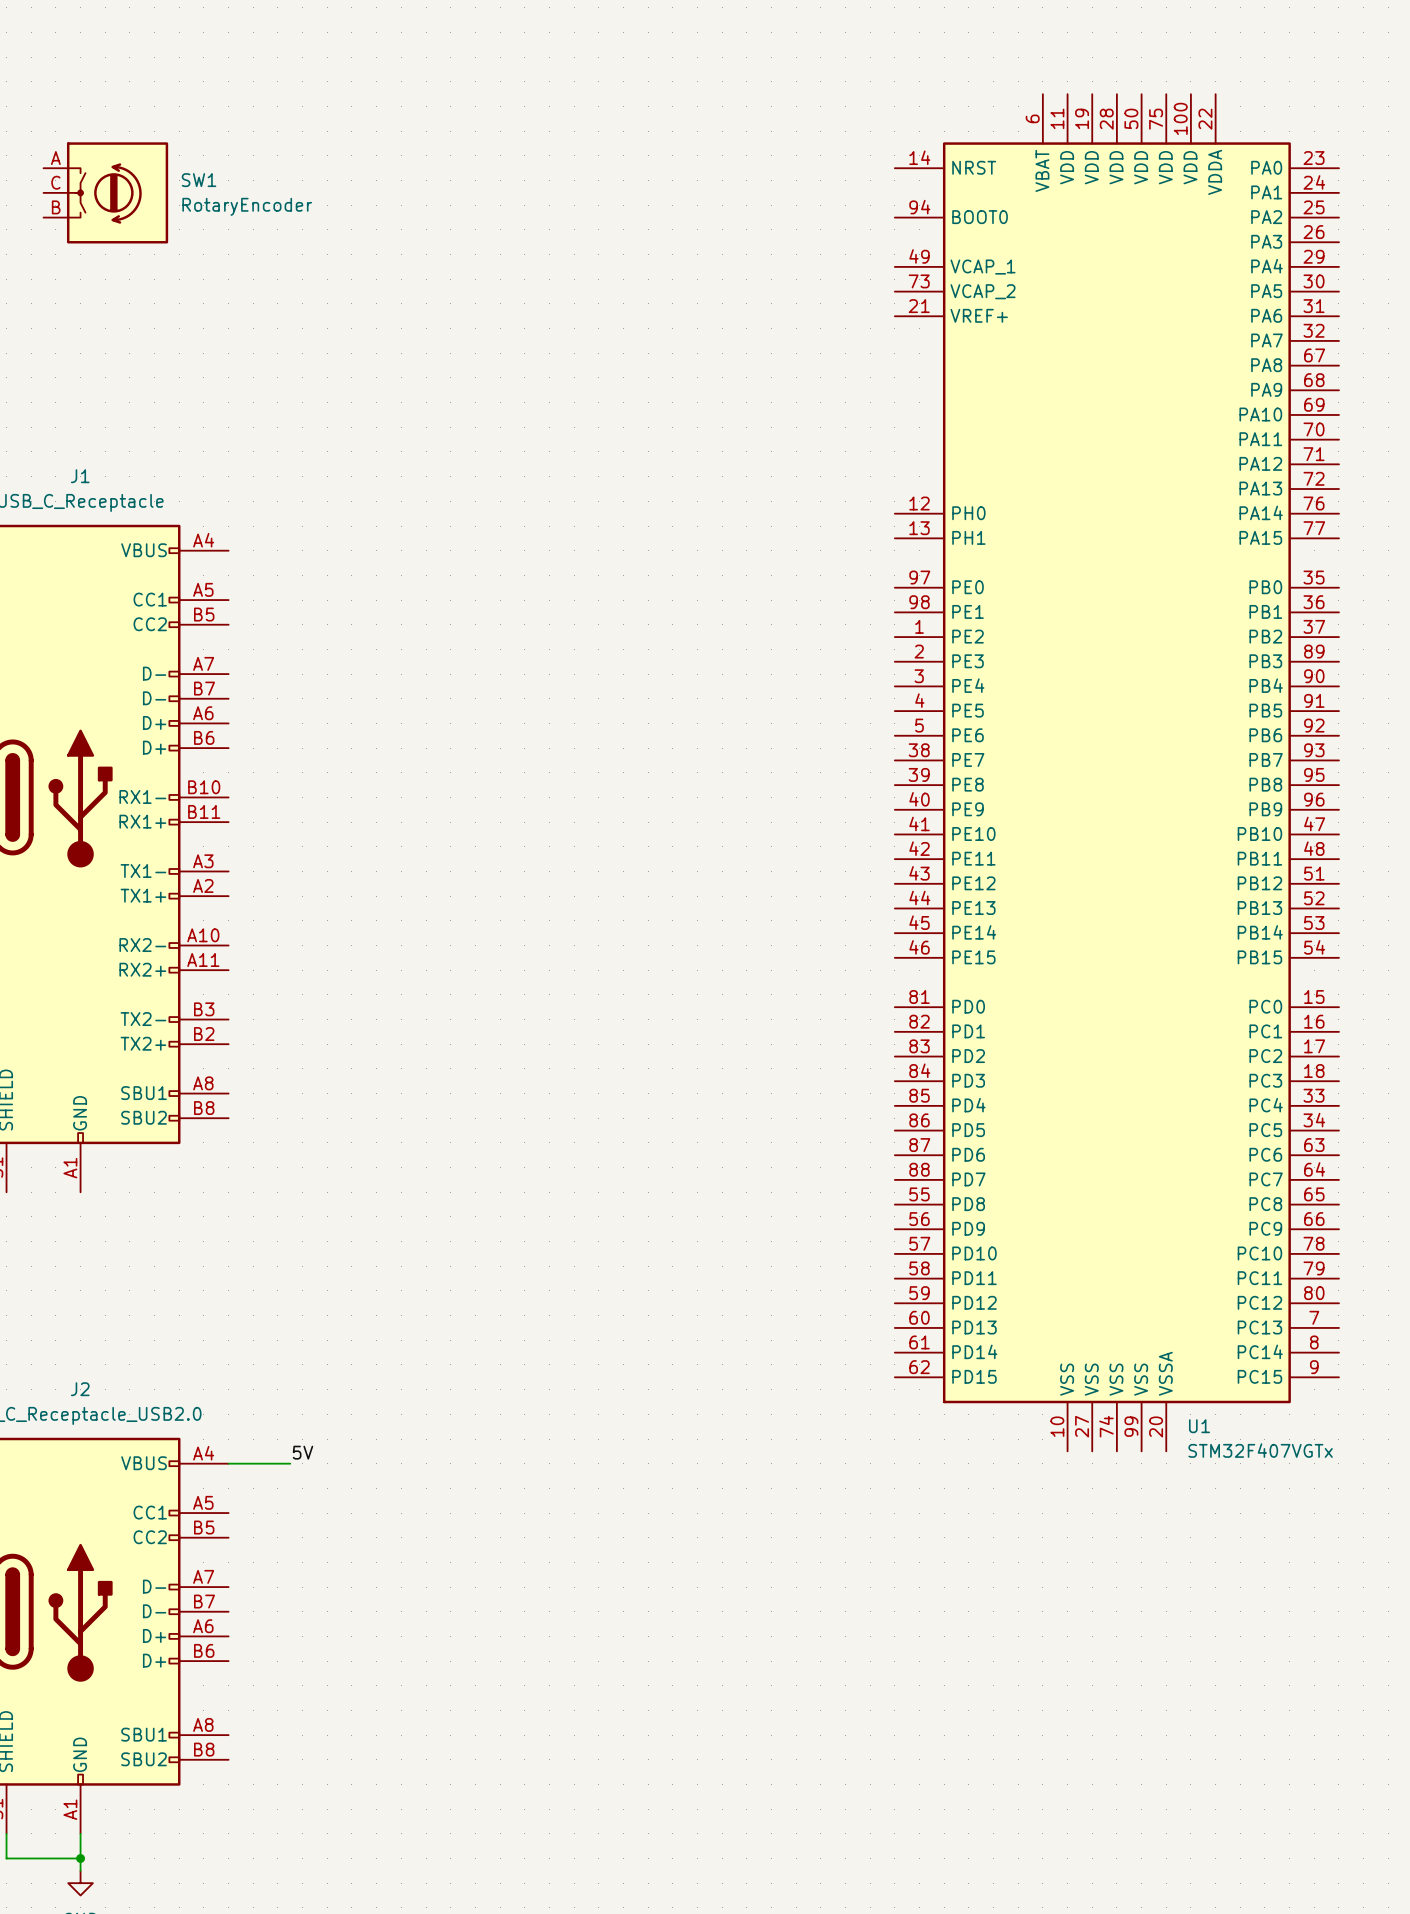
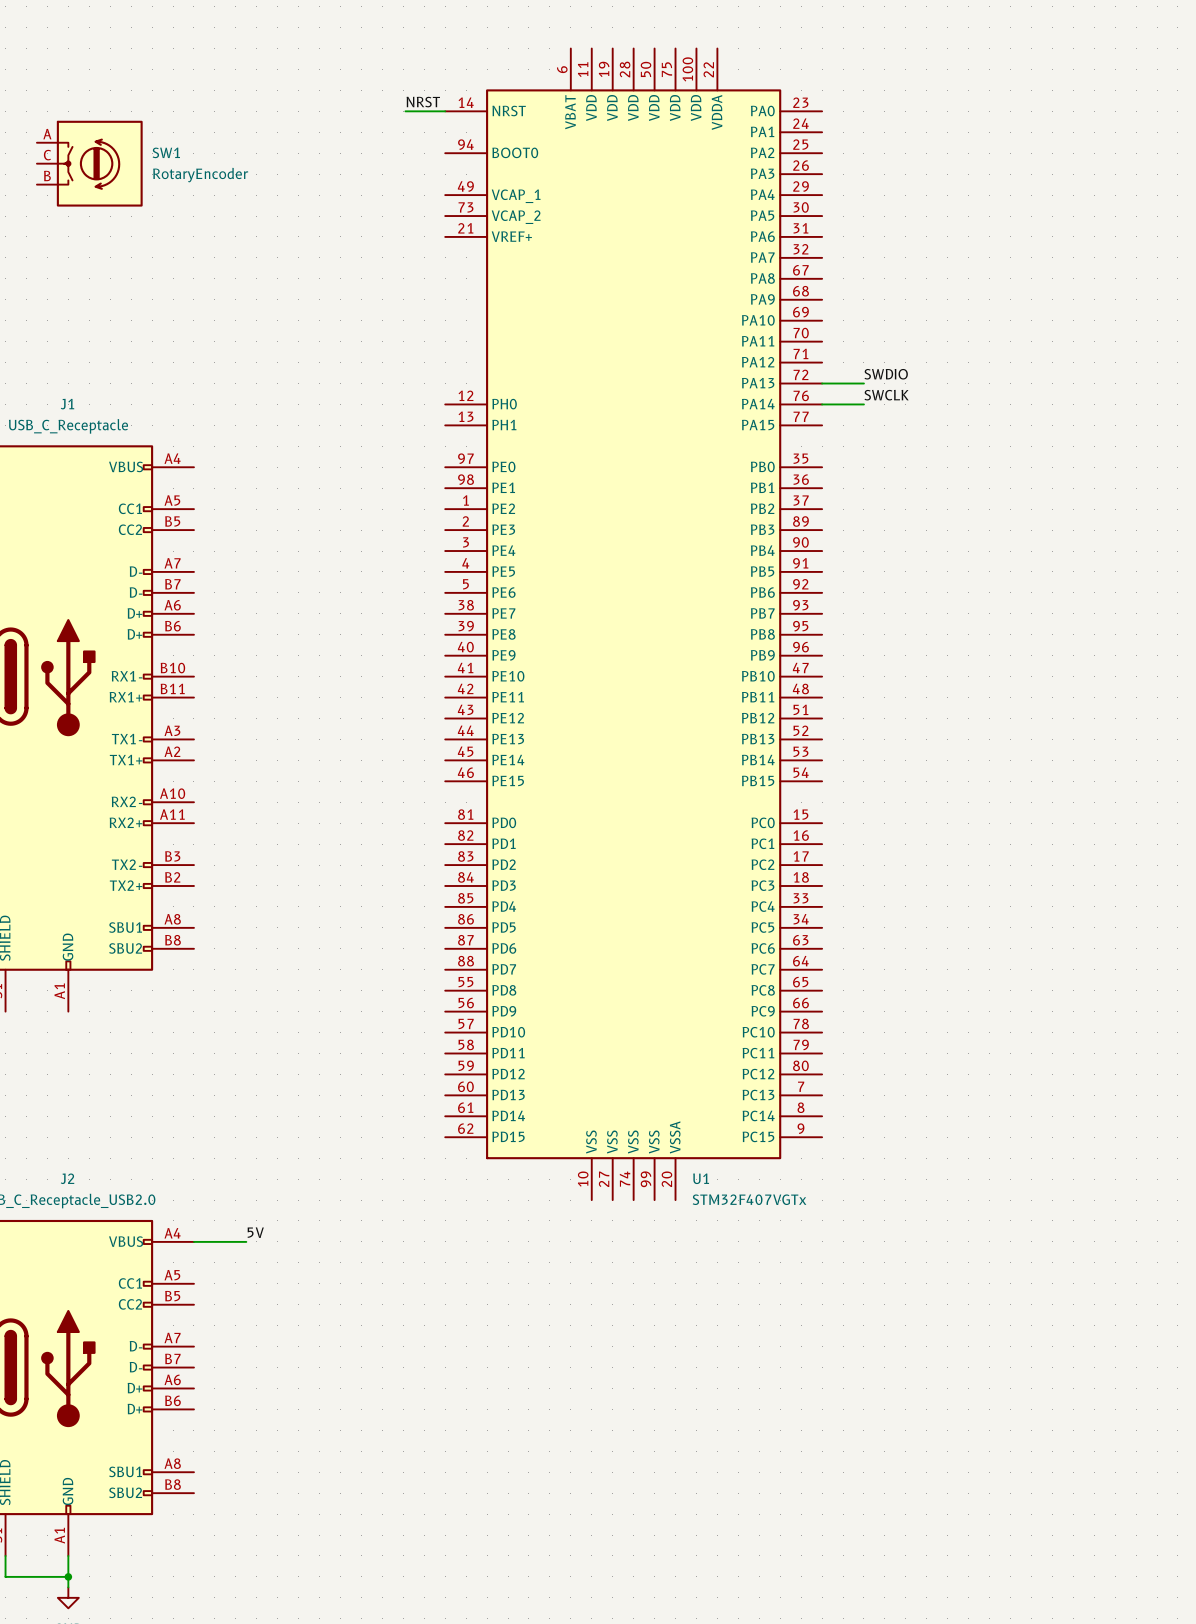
label: none -> NRST (423, 102)
wire: none -> (405, 111) (445, 111)
label: none -> SWDIO (886, 374)
label: none -> SWCLK (886, 395)
U1 position: (1116, 772) -> (633, 624)

